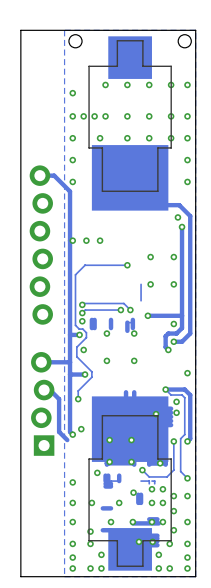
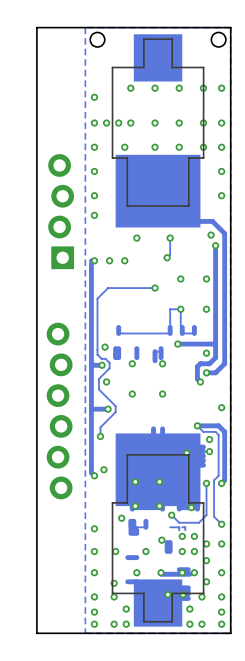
track: (39, 175) (54, 175) (70, 191) (70, 243) -> none
via: none -> (94, 215)
via: none -> (136, 238)
track: none -> (170, 238) (170, 254) (167, 257)
via: none -> (170, 238)
via: none -> (167, 257)
part position: (41, 245) -> (59, 411)
track: none -> (170, 309) (180, 309) (182, 333) (194, 333) (194, 327)
track: none -> (170, 327) (170, 333) (118, 333) (118, 327)
track: (82, 304) (123, 303) (130, 310) -> none
via: (82, 304) -> none
track: (120, 310) (85, 310) (82, 313) -> none
via: (120, 310) -> none
via: (130, 310) -> none
via: (82, 313) -> none
via: none -> (105, 347)
via: (82, 321) -> none
track: (70, 362) (41, 362) -> none
track: (44, 390) (50, 390) (59, 399) (59, 431) (67, 440) -> none
part position: (42, 403) -> (61, 211)

